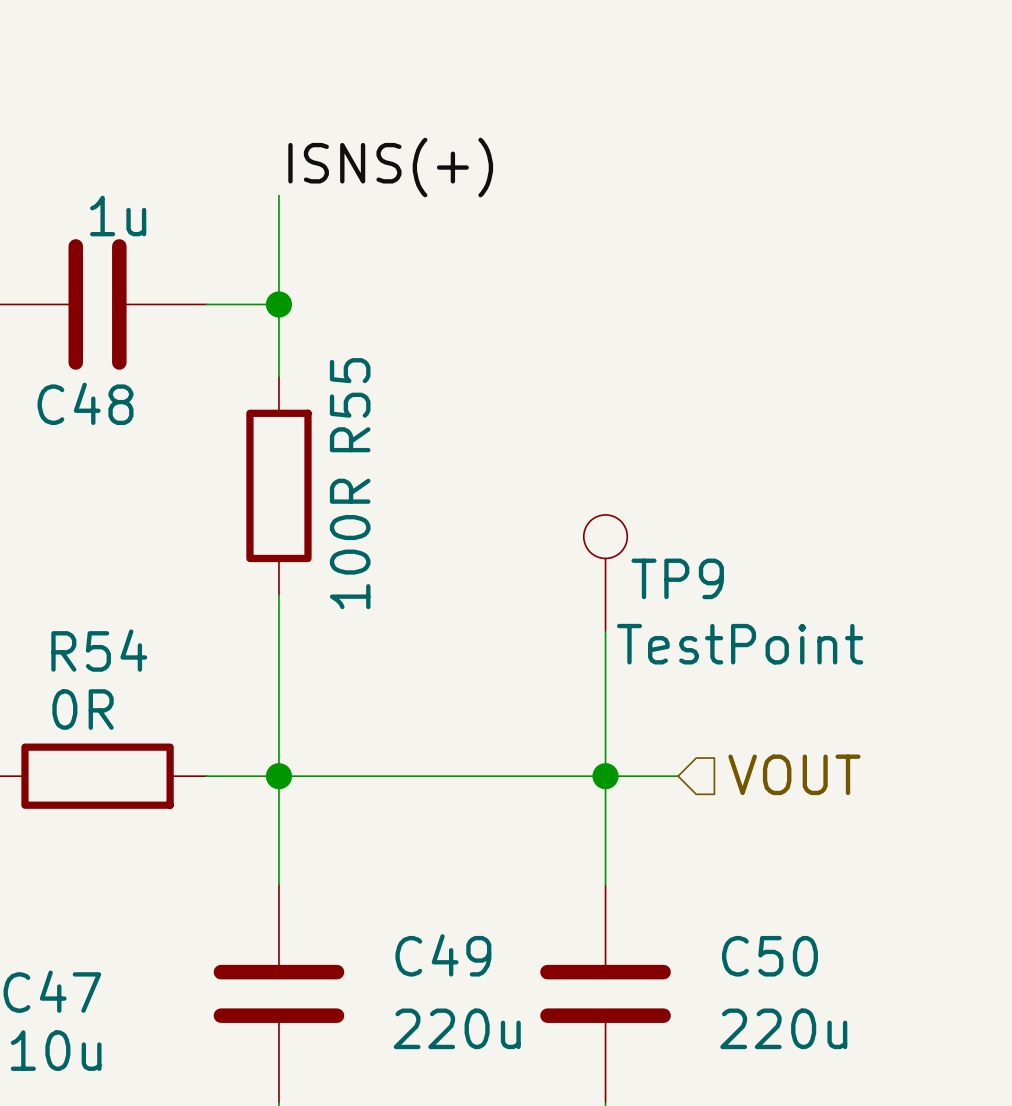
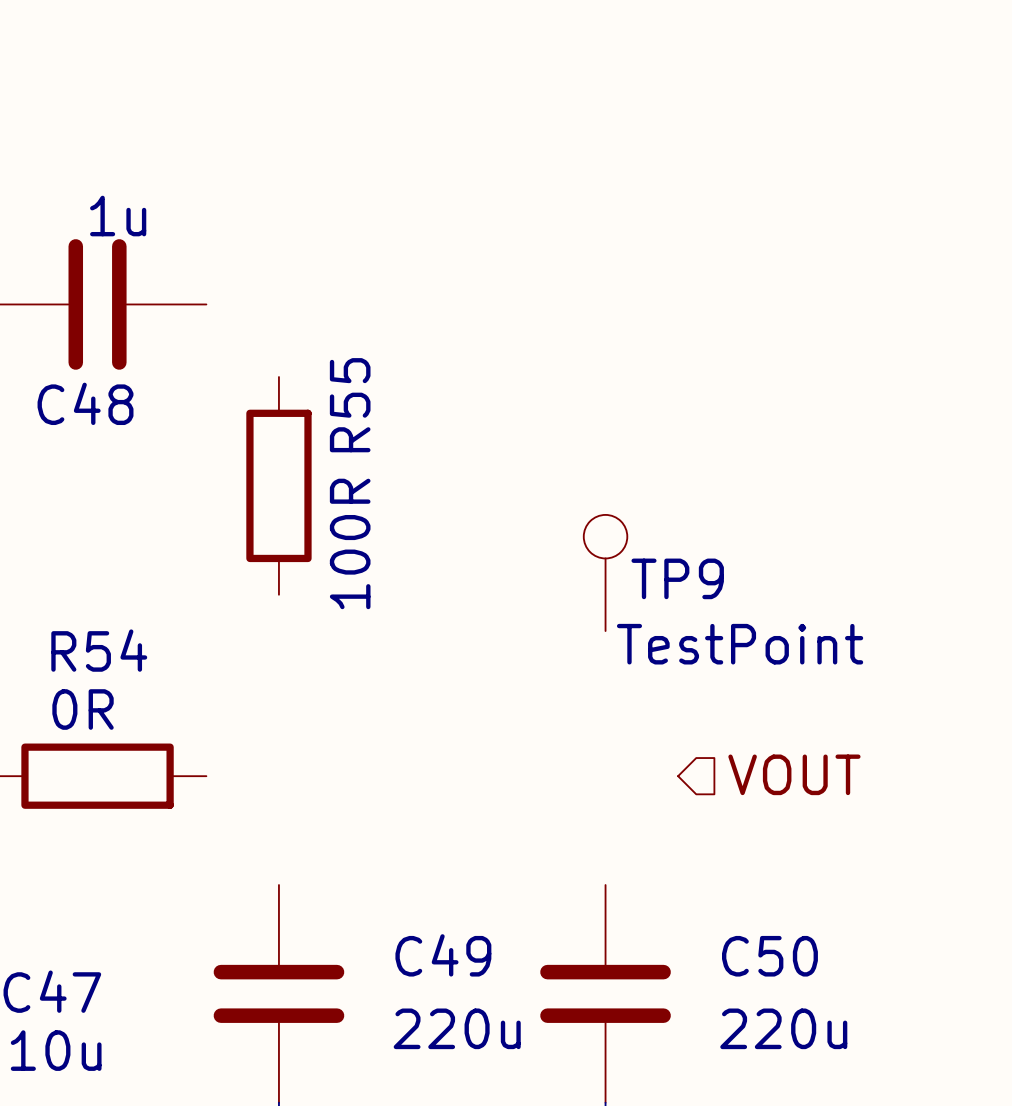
label: ISNS(+) (390, 167) -> none
wire: (278, 195) (278, 377) -> none
wire: (206, 304) (278, 304) -> none
junction: (278, 304) -> none
wire: (278, 594) (278, 885) -> none
wire: (605, 631) (605, 885) -> none
wire: (206, 776) (678, 776) -> none
junction: (278, 776) -> none
junction: (605, 776) -> none

